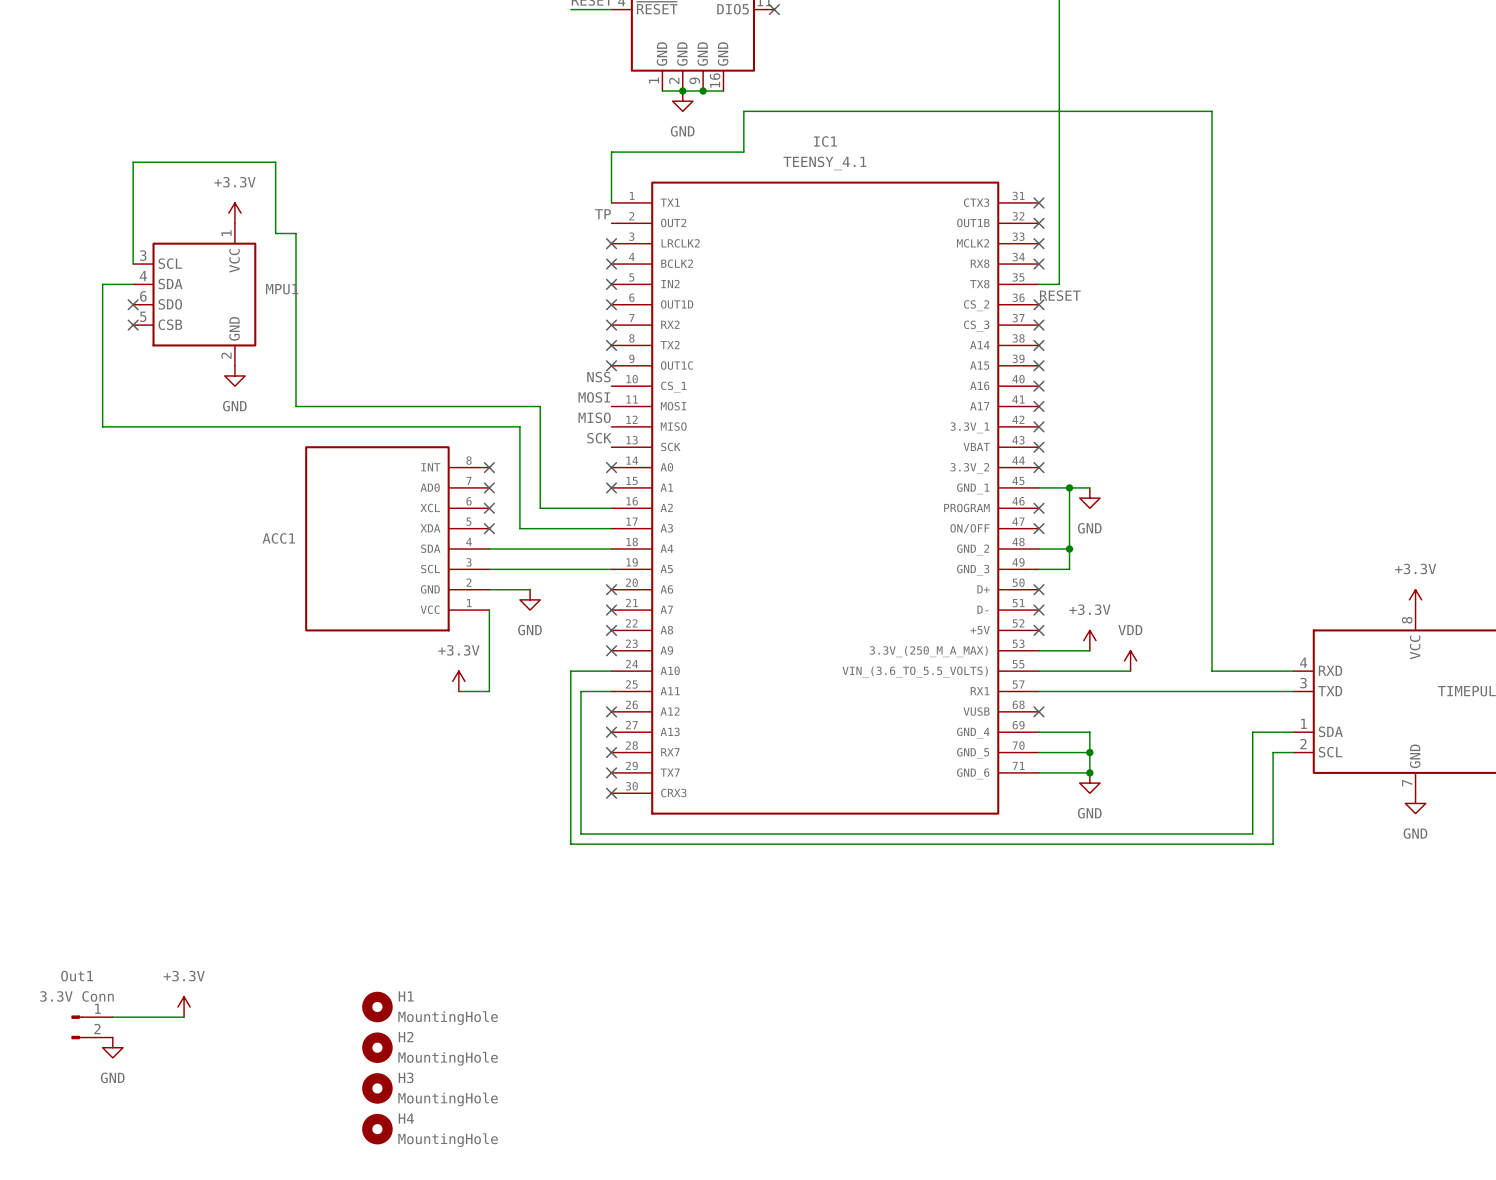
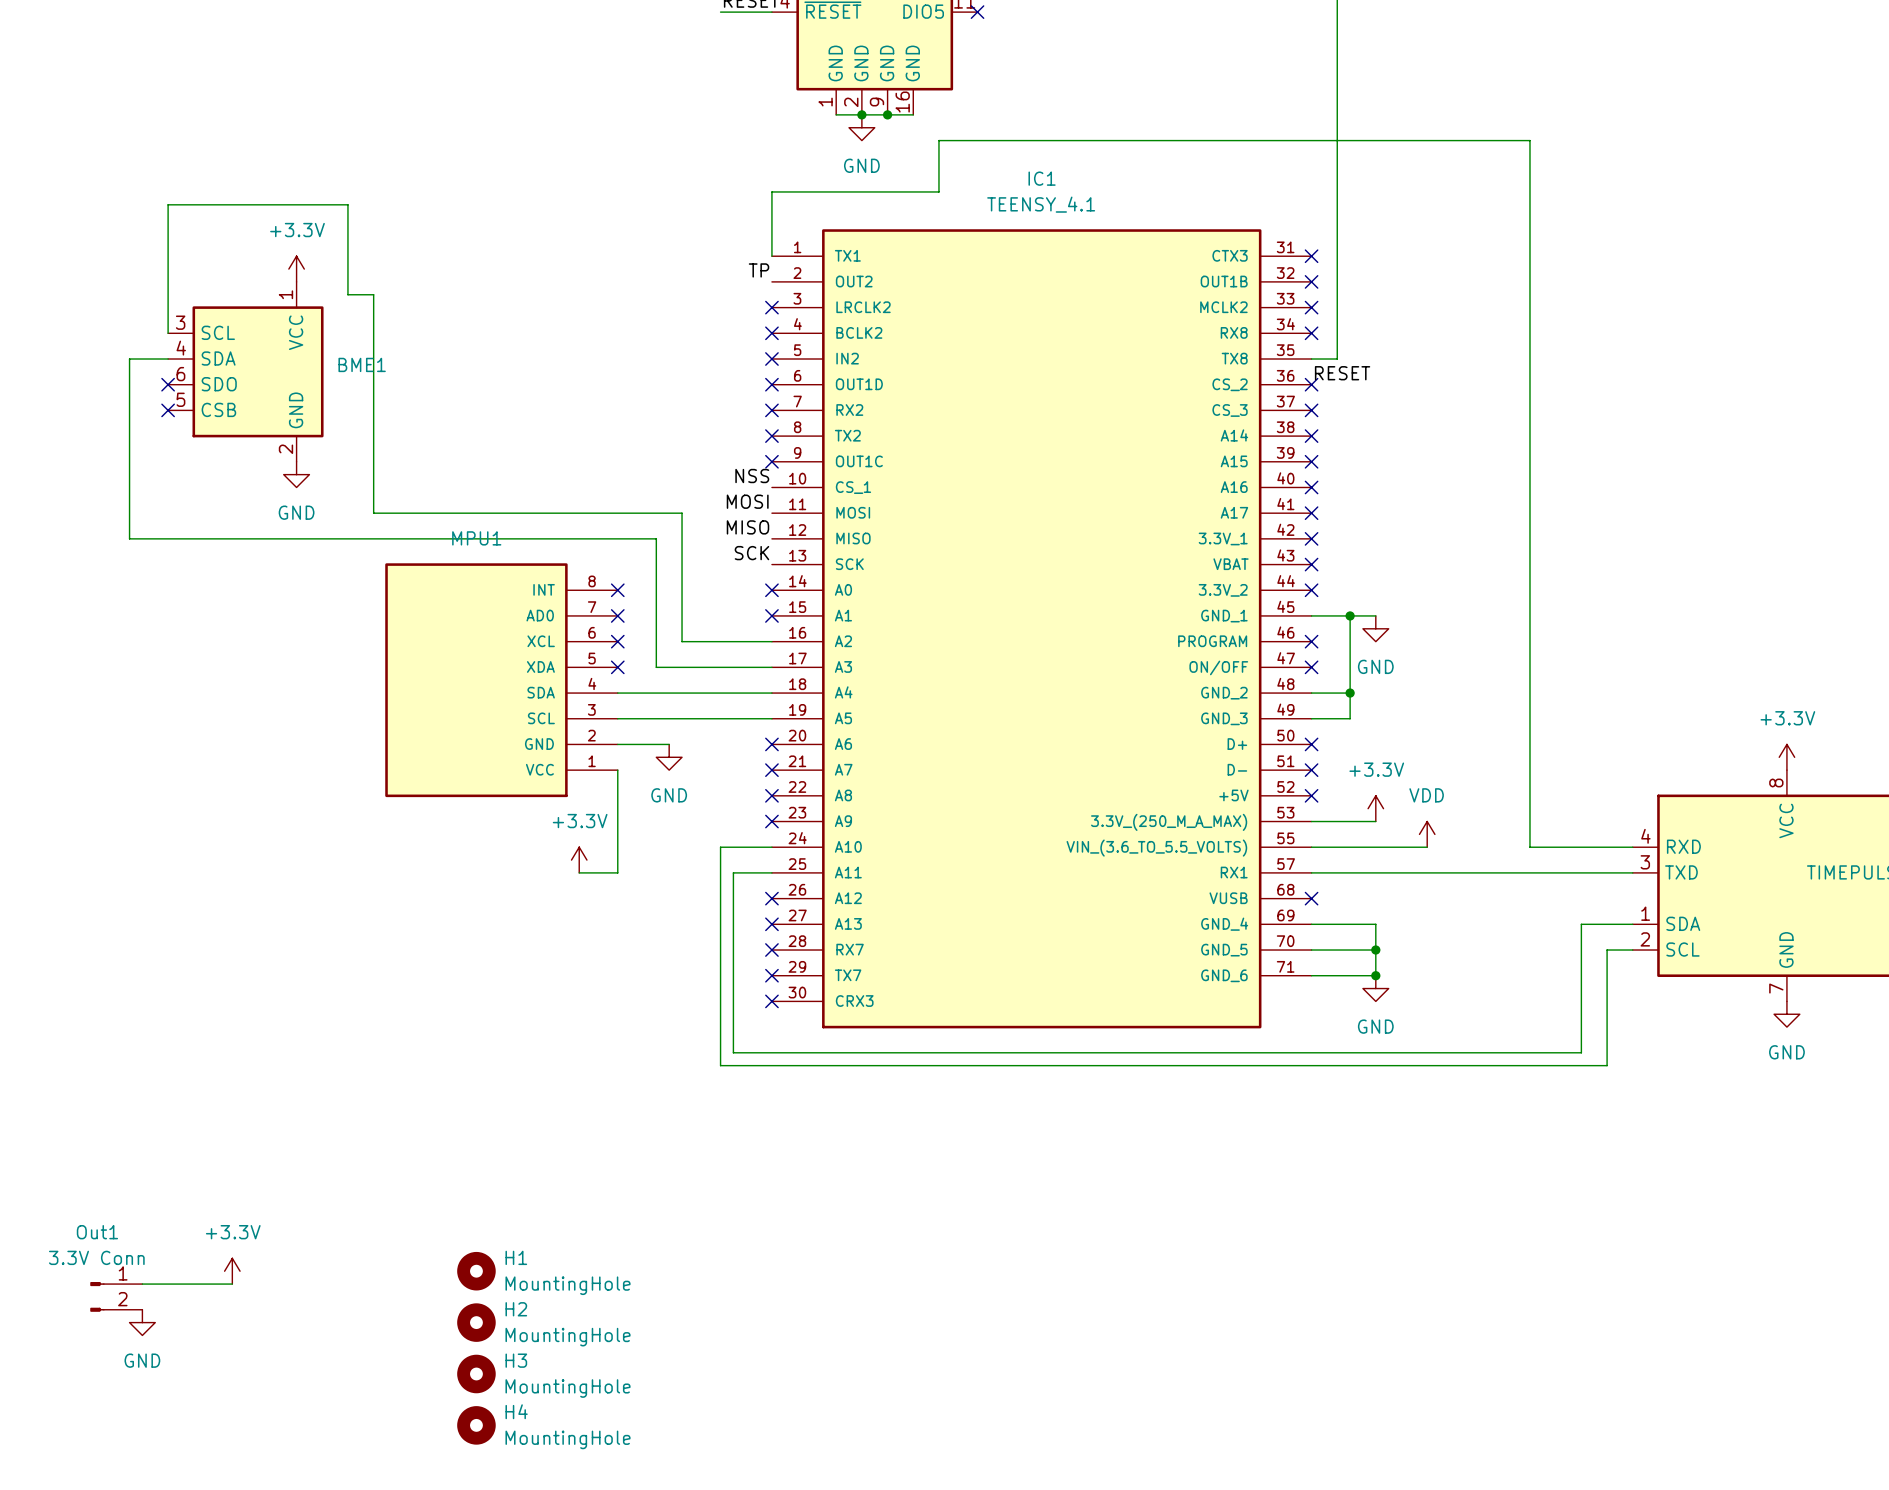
MPU1 name: MPU1 (282, 289) -> BME1 (362, 364)
ACC1 name: ACC1 (278, 538) -> MPU1 (476, 538)

